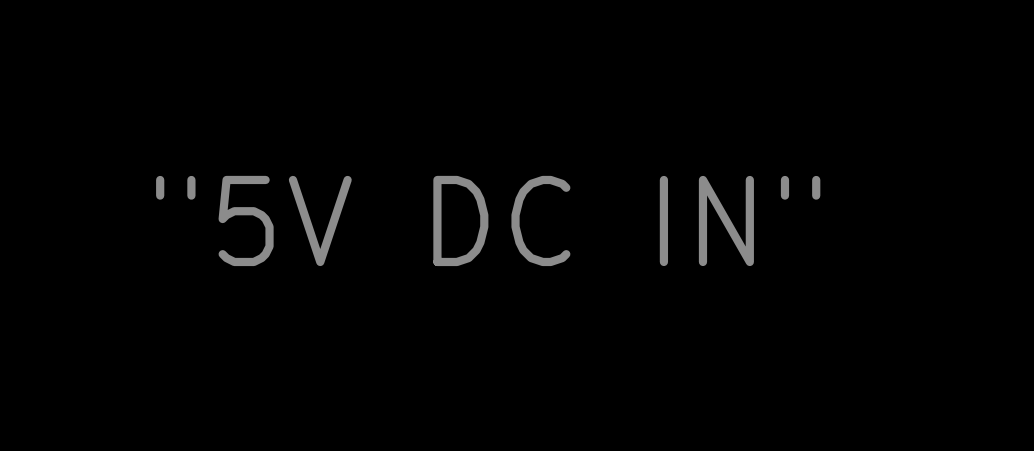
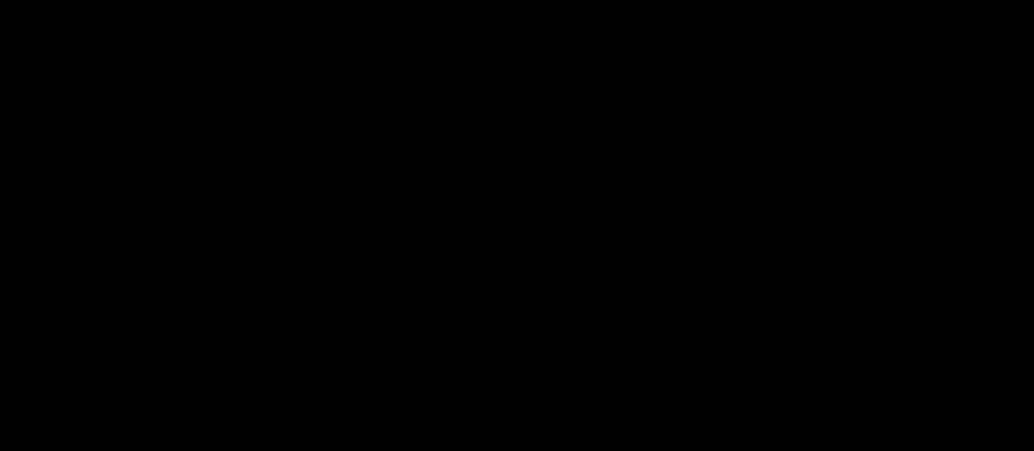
text: "5V DC IN" (488, 220) -> none

